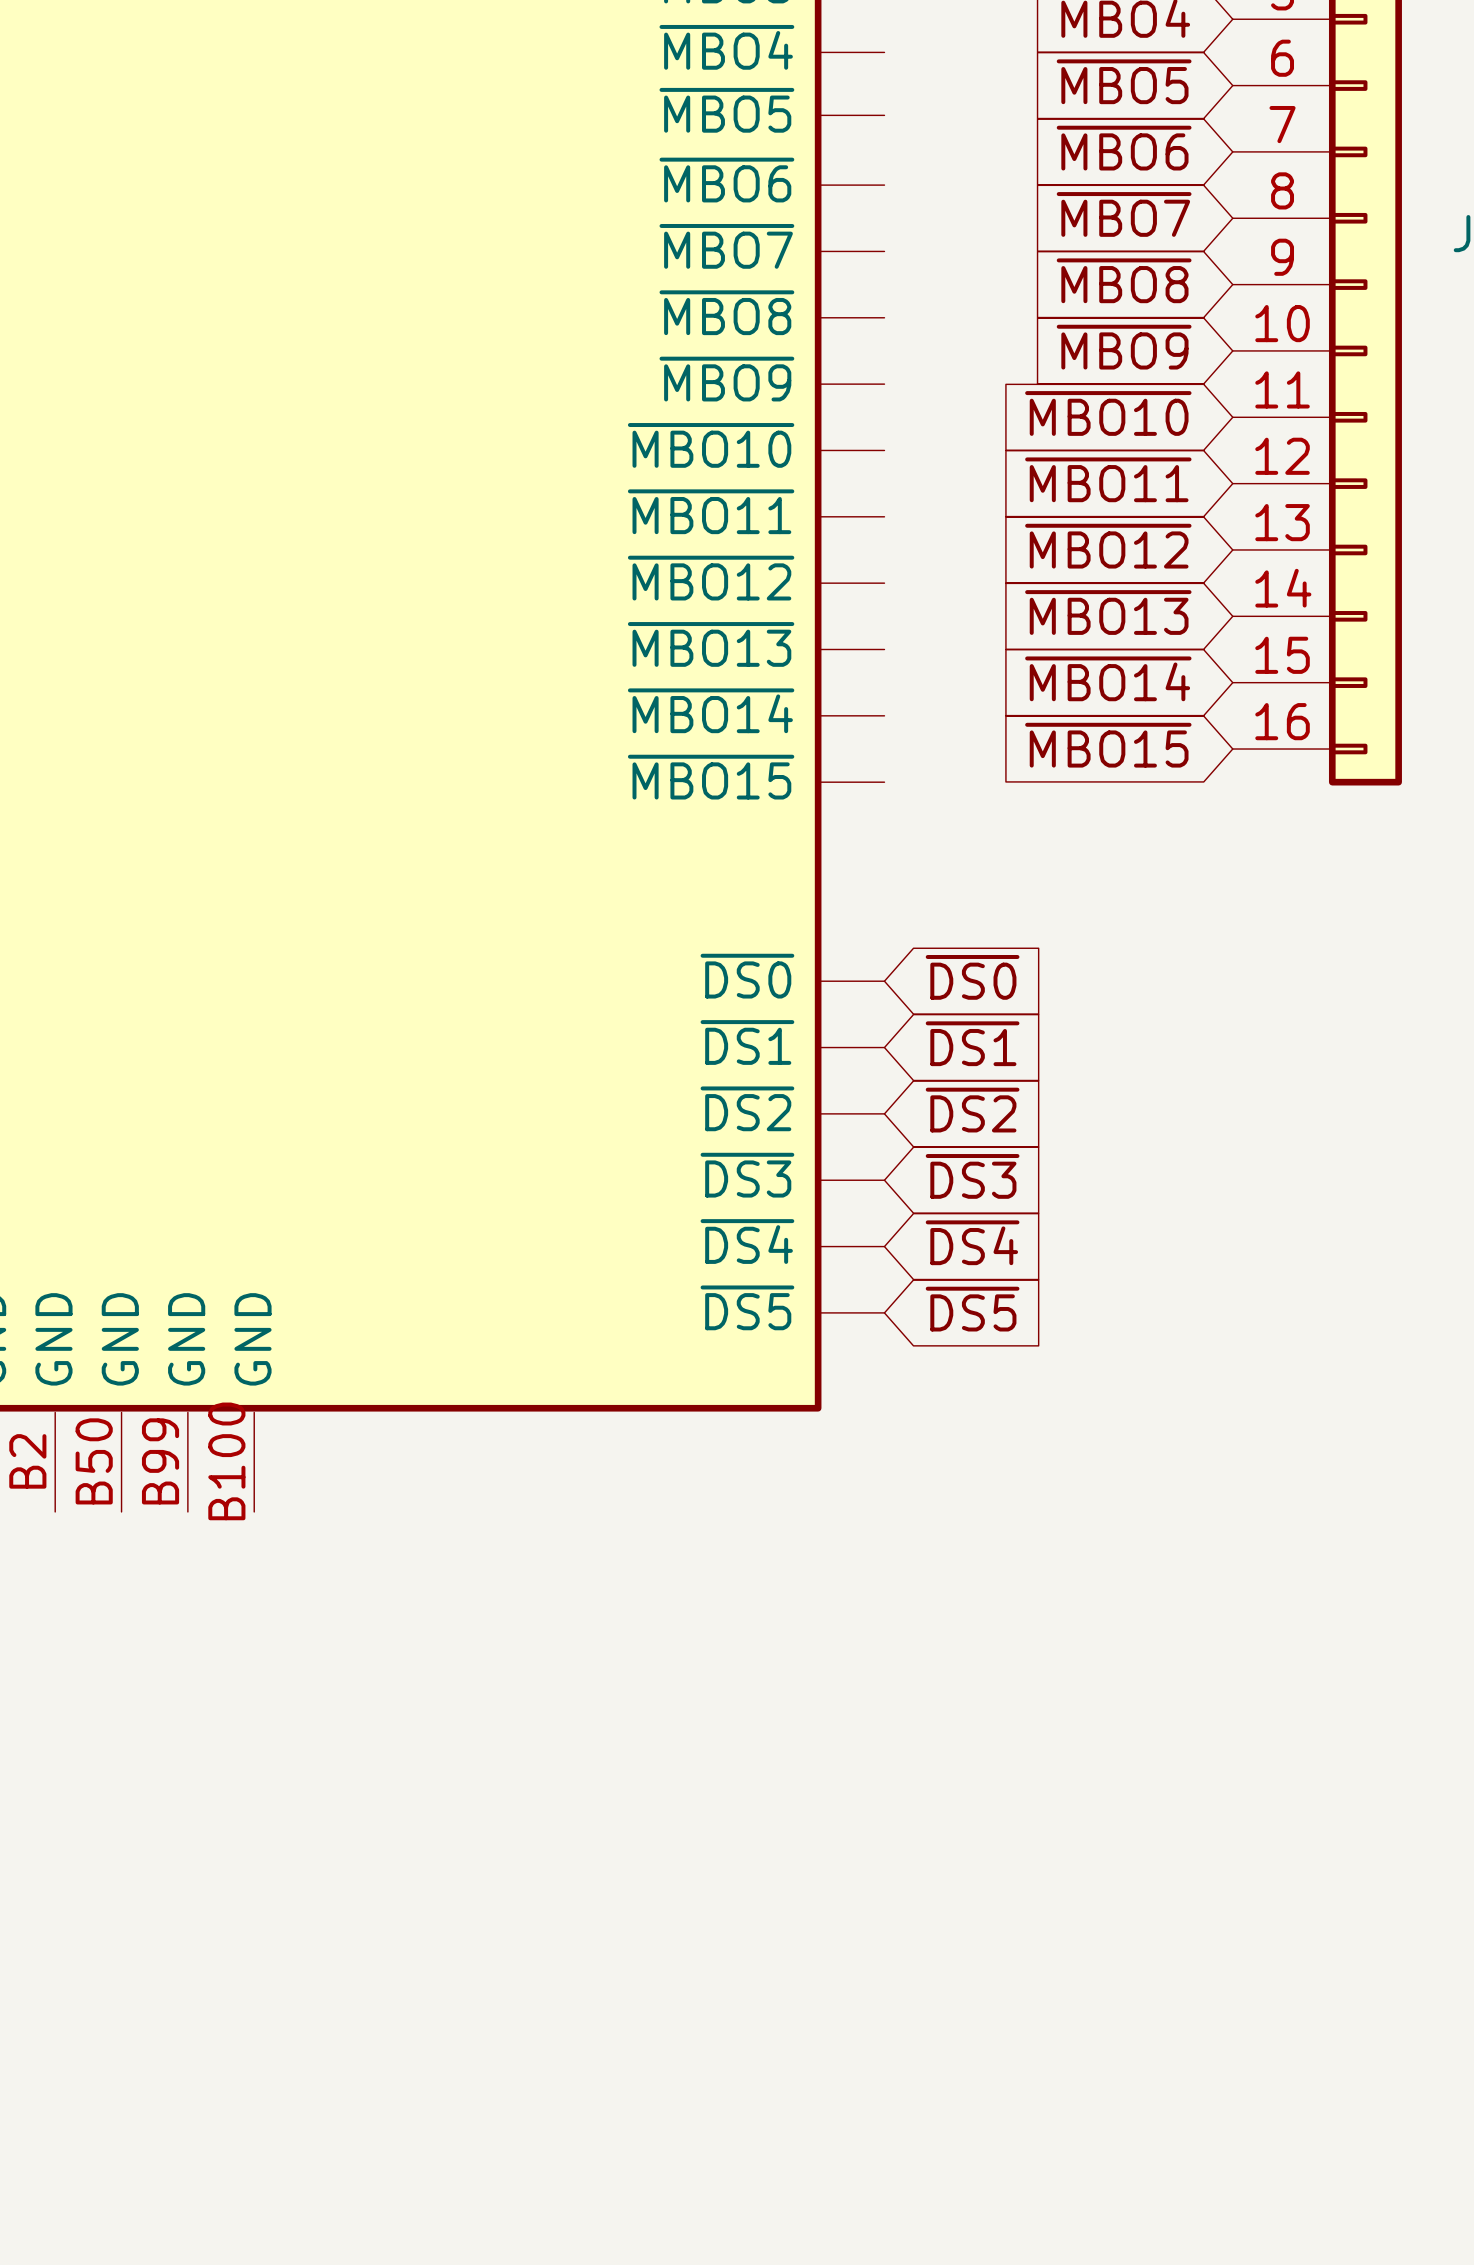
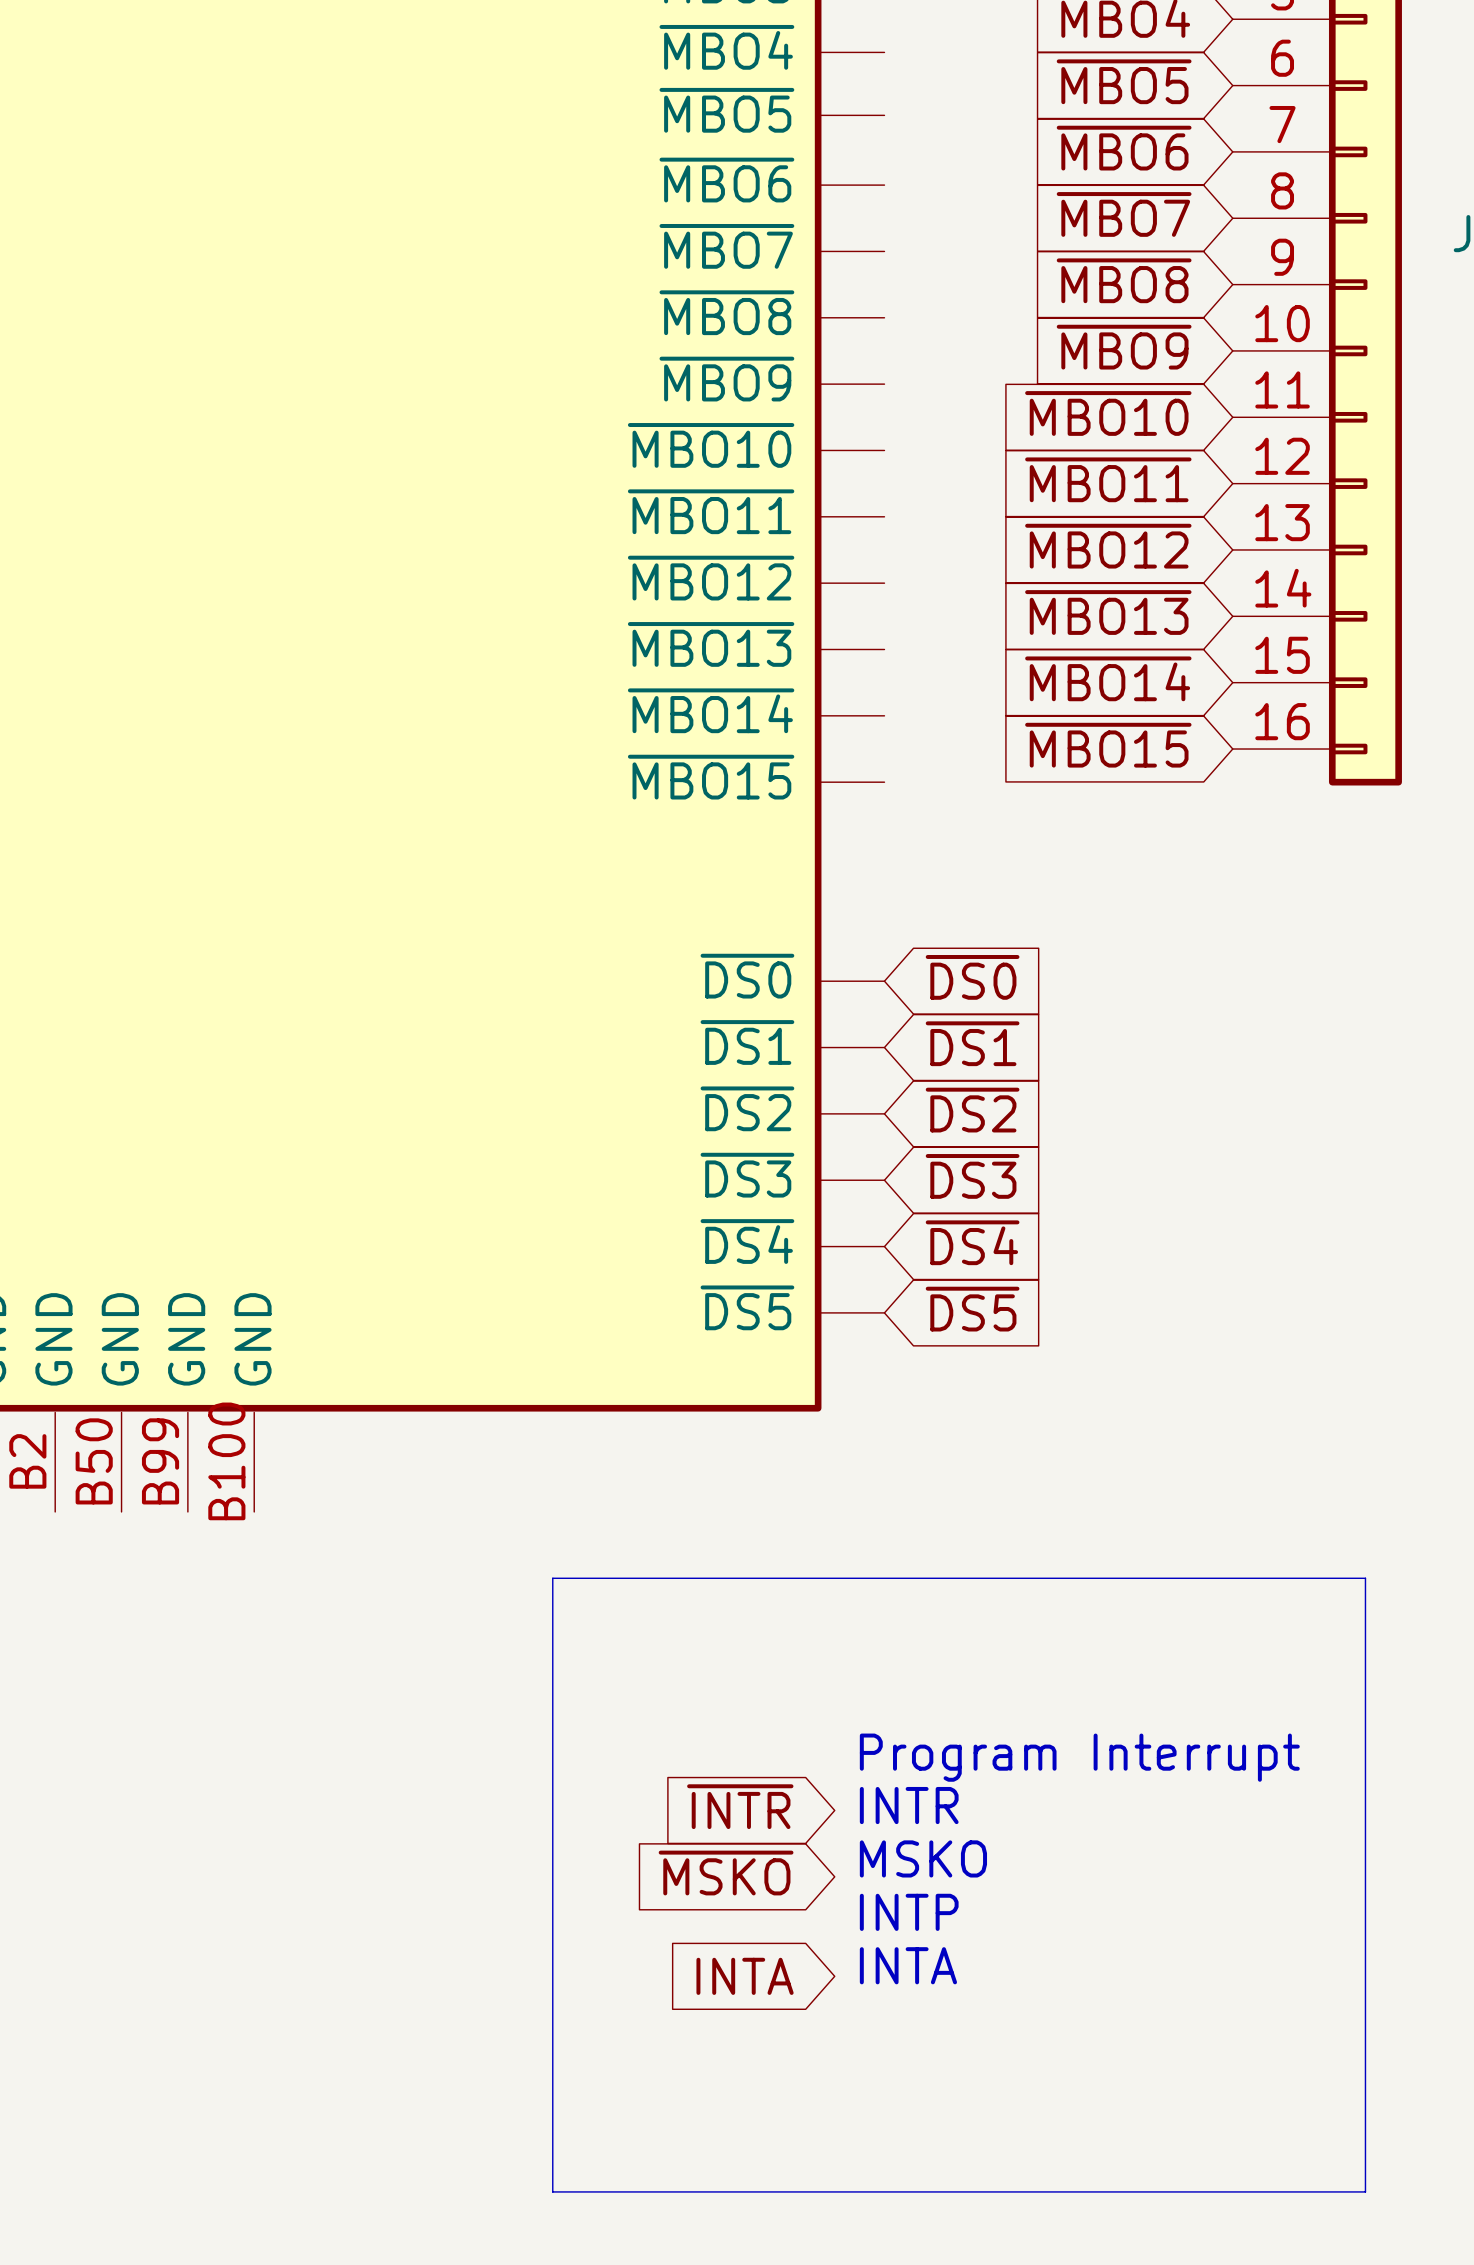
line: none -> (552, 1578) (1365, 1578) (1365, 2191) (552, 2191) (552, 1578)
text: none -> Program Interrupt (1079, 1757)
text: none -> INTR (909, 1805)
global label: none -> ~{INTR} (740, 1806)
text: none -> MSKO (923, 1858)
global label: none -> ~{MSKO} (726, 1873)
text: none -> INTP (909, 1912)
text: none -> INTA (908, 1965)
global label: none -> INTA (745, 1976)

